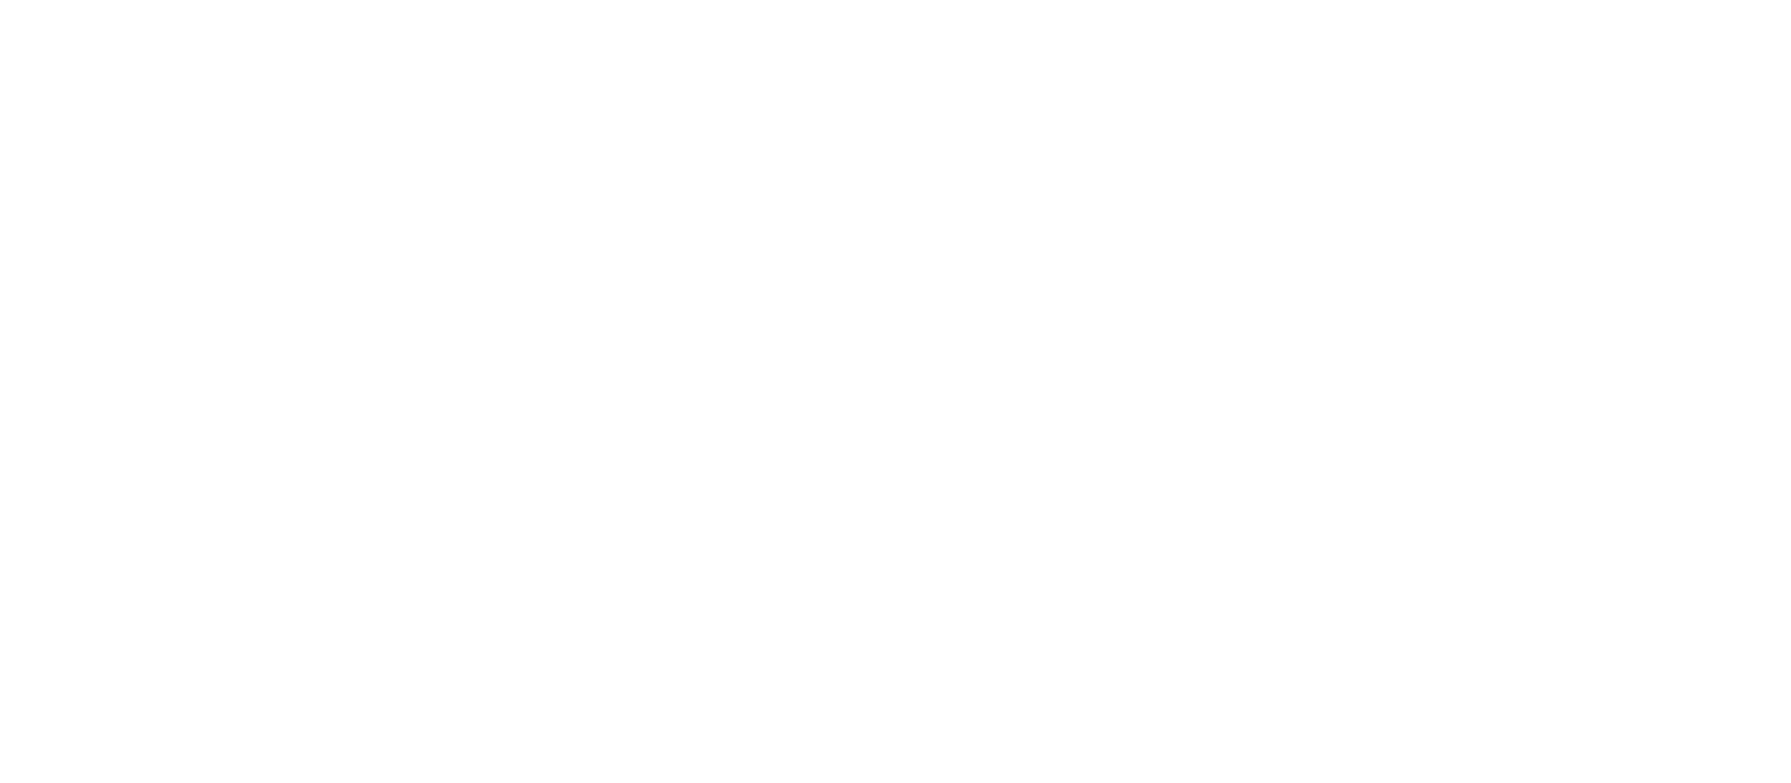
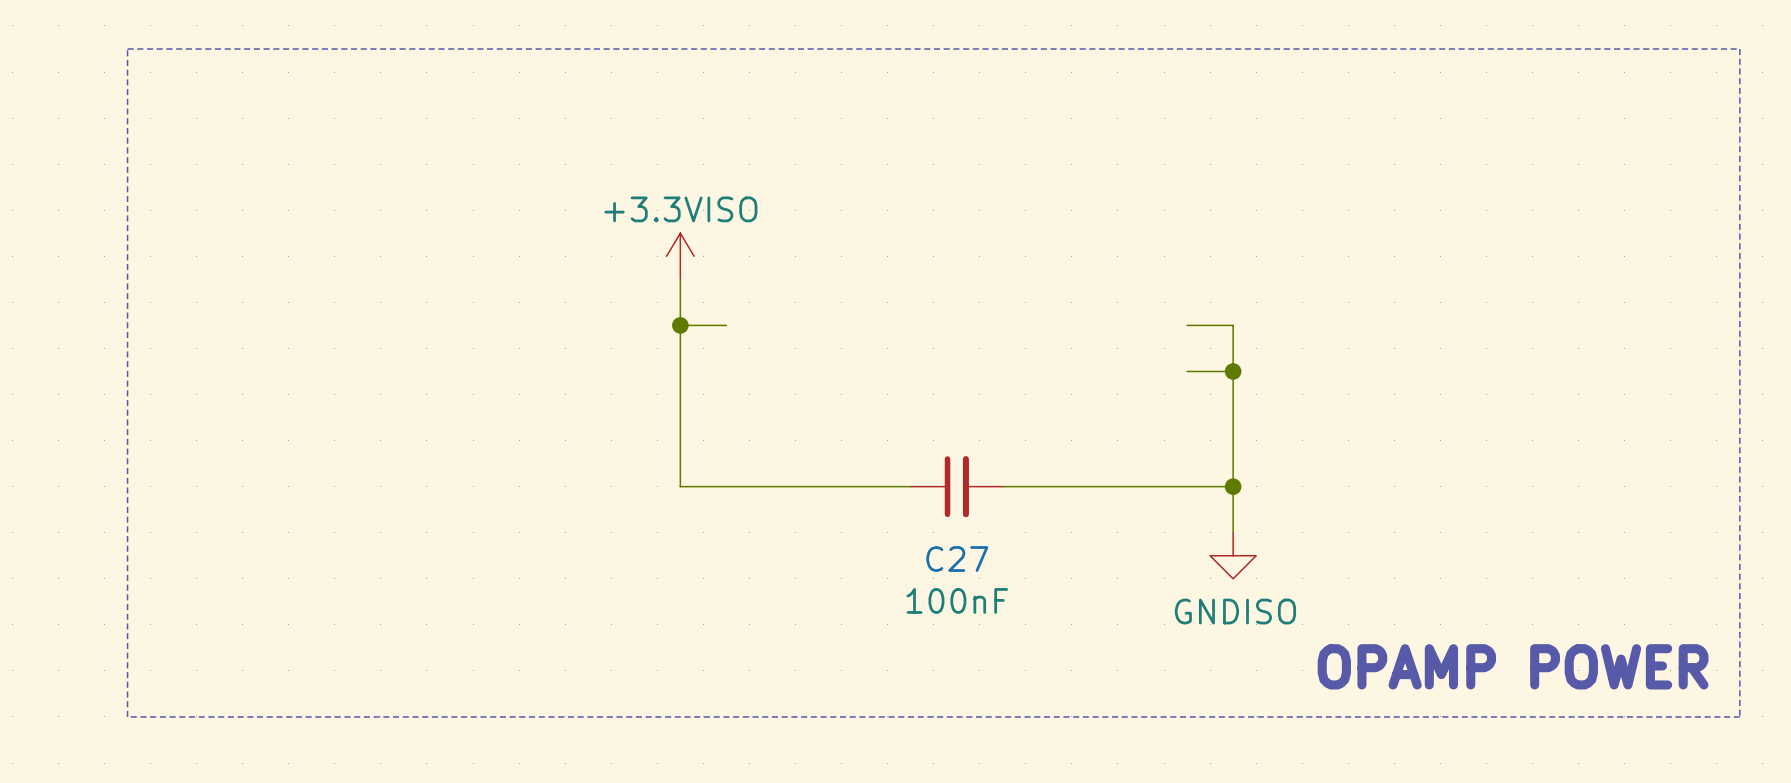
line: none -> (127, 49) (1739, 49) (1739, 716) (127, 716) (127, 49)
power symbol: none -> +3.3VISO (680, 256)
wire: none -> (680, 279) (680, 486) (910, 486)
wire: none -> (680, 325) (726, 325)
junction: none -> (680, 325)
wire: none -> (1187, 325) (1233, 325) (1233, 532)
wire: none -> (1187, 371) (1233, 371)
junction: none -> (1233, 371)
C27: none -> 100nF (956, 486)
wire: none -> (1002, 486) (1233, 486)
junction: none -> (1233, 486)
power symbol: none -> GNDISO (1233, 555)
text: none -> OPAMP POWER (1513, 666)

